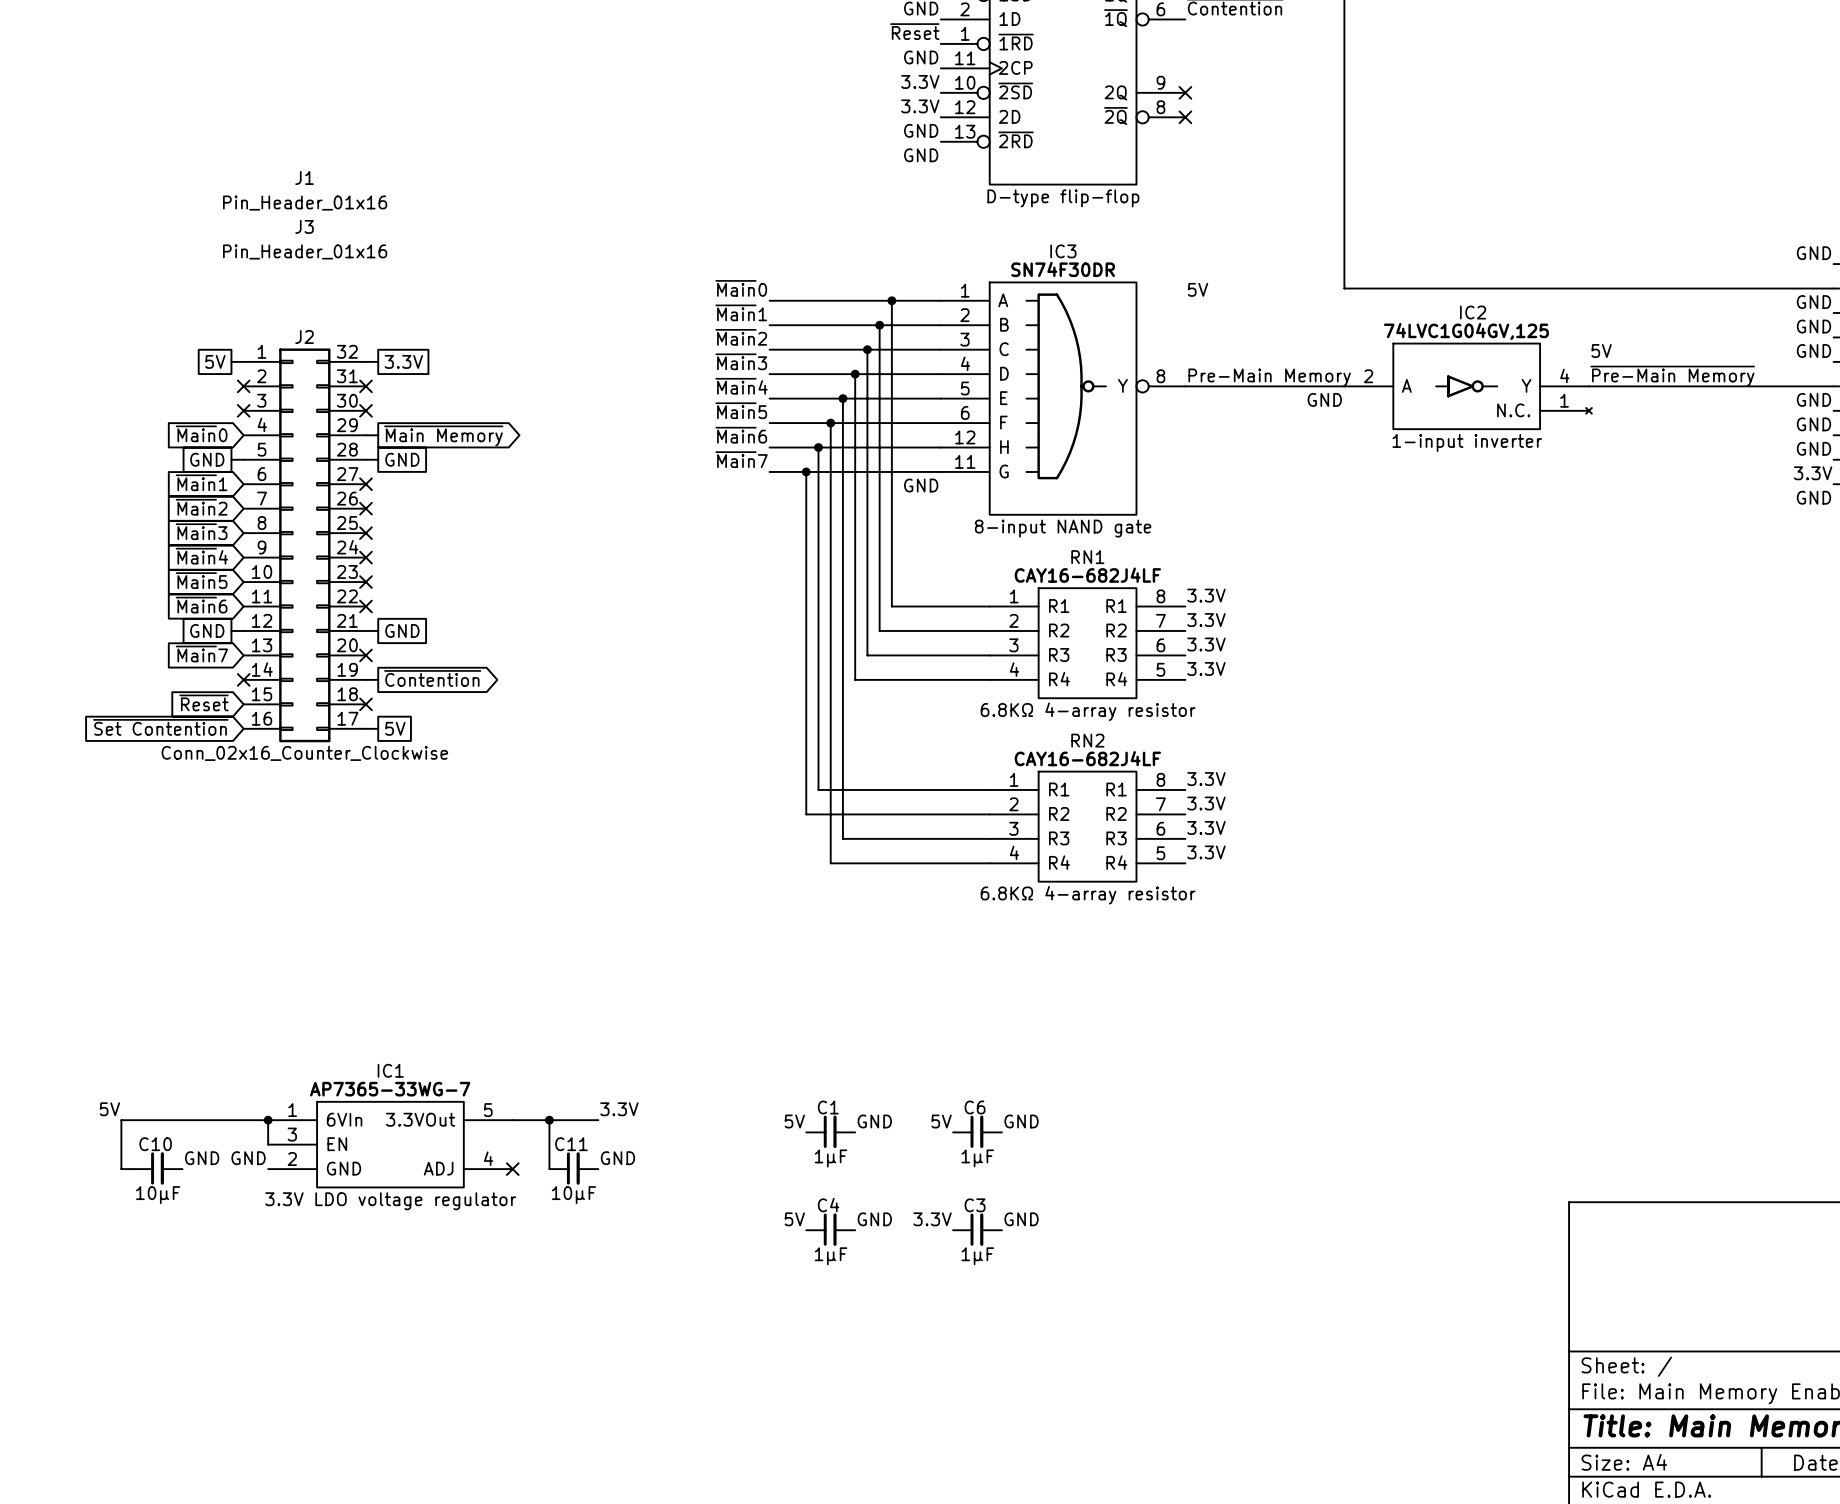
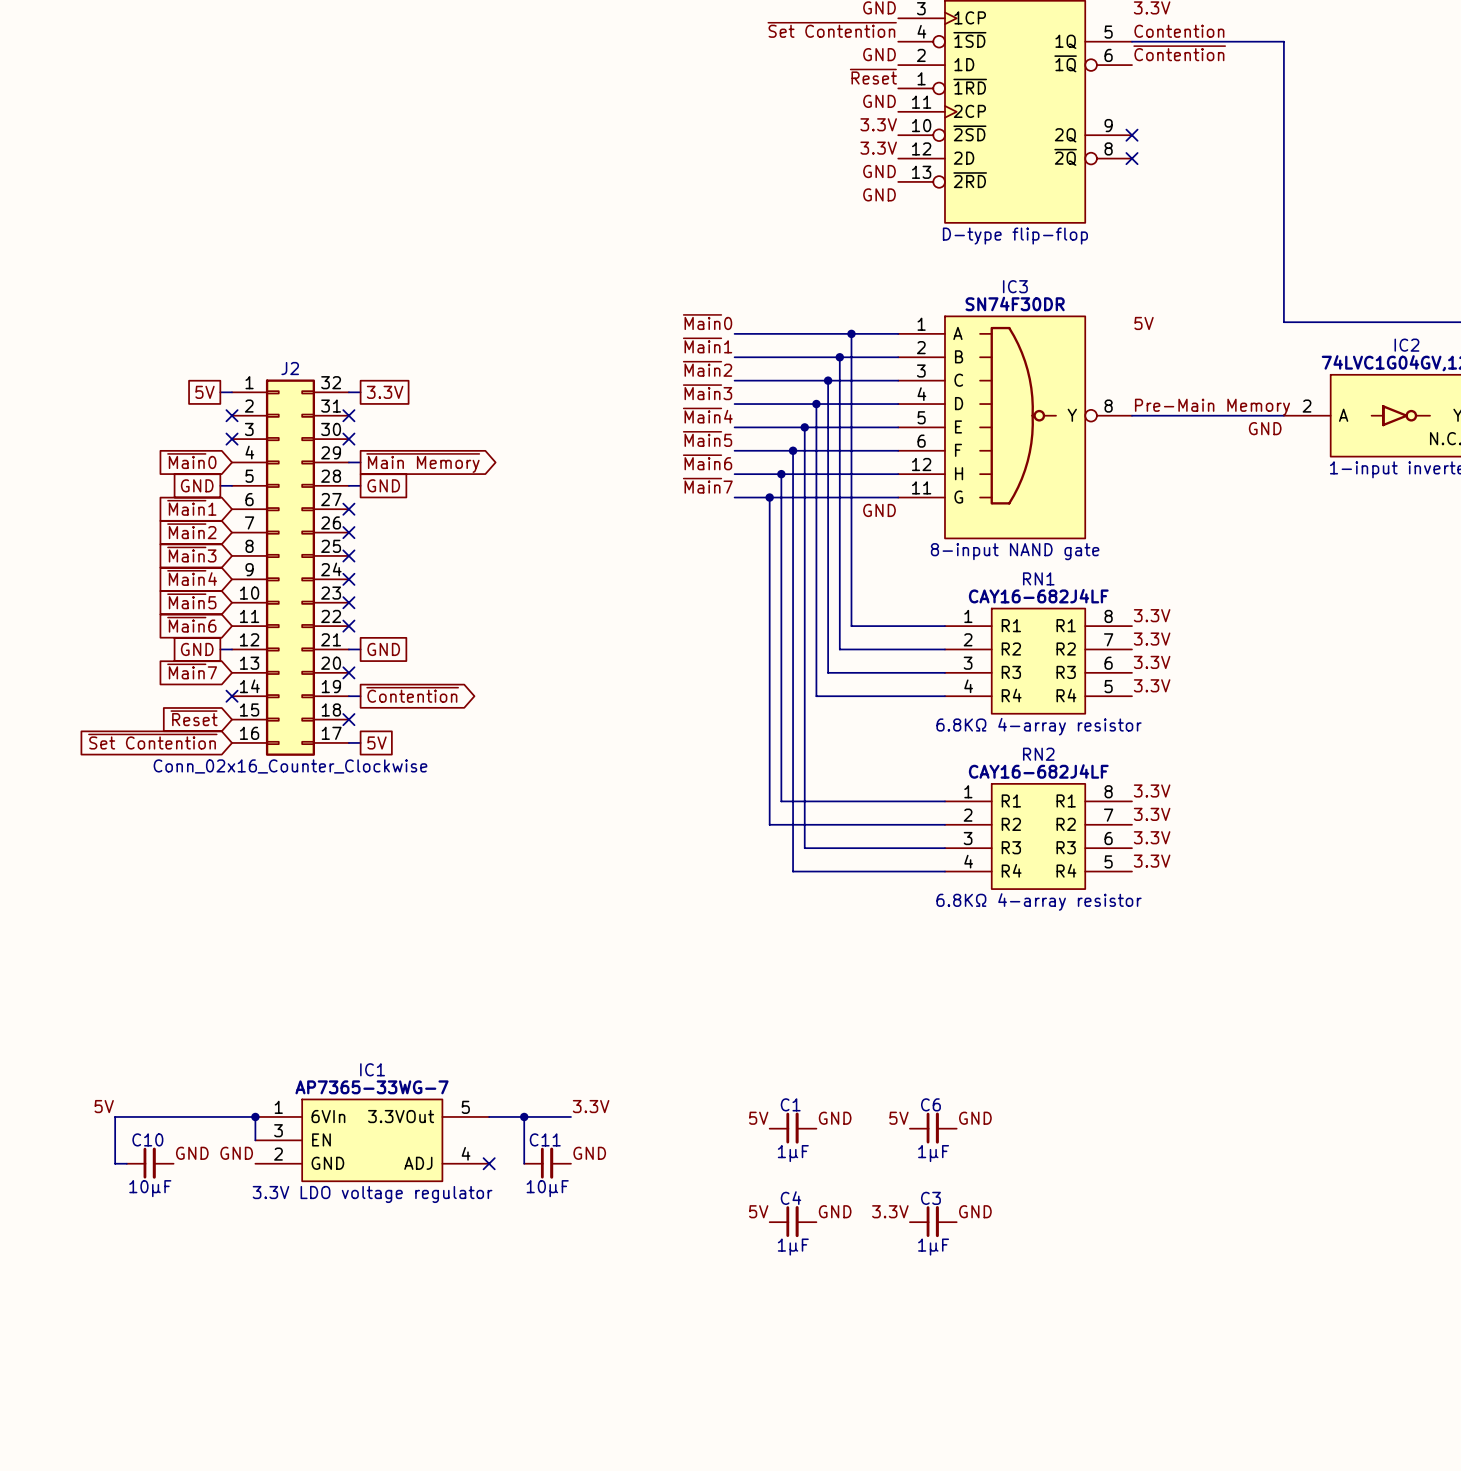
J1: Pin_Header_01x16 (305, 190) -> none
J3: Pin_Header_01x16 (305, 239) -> none

